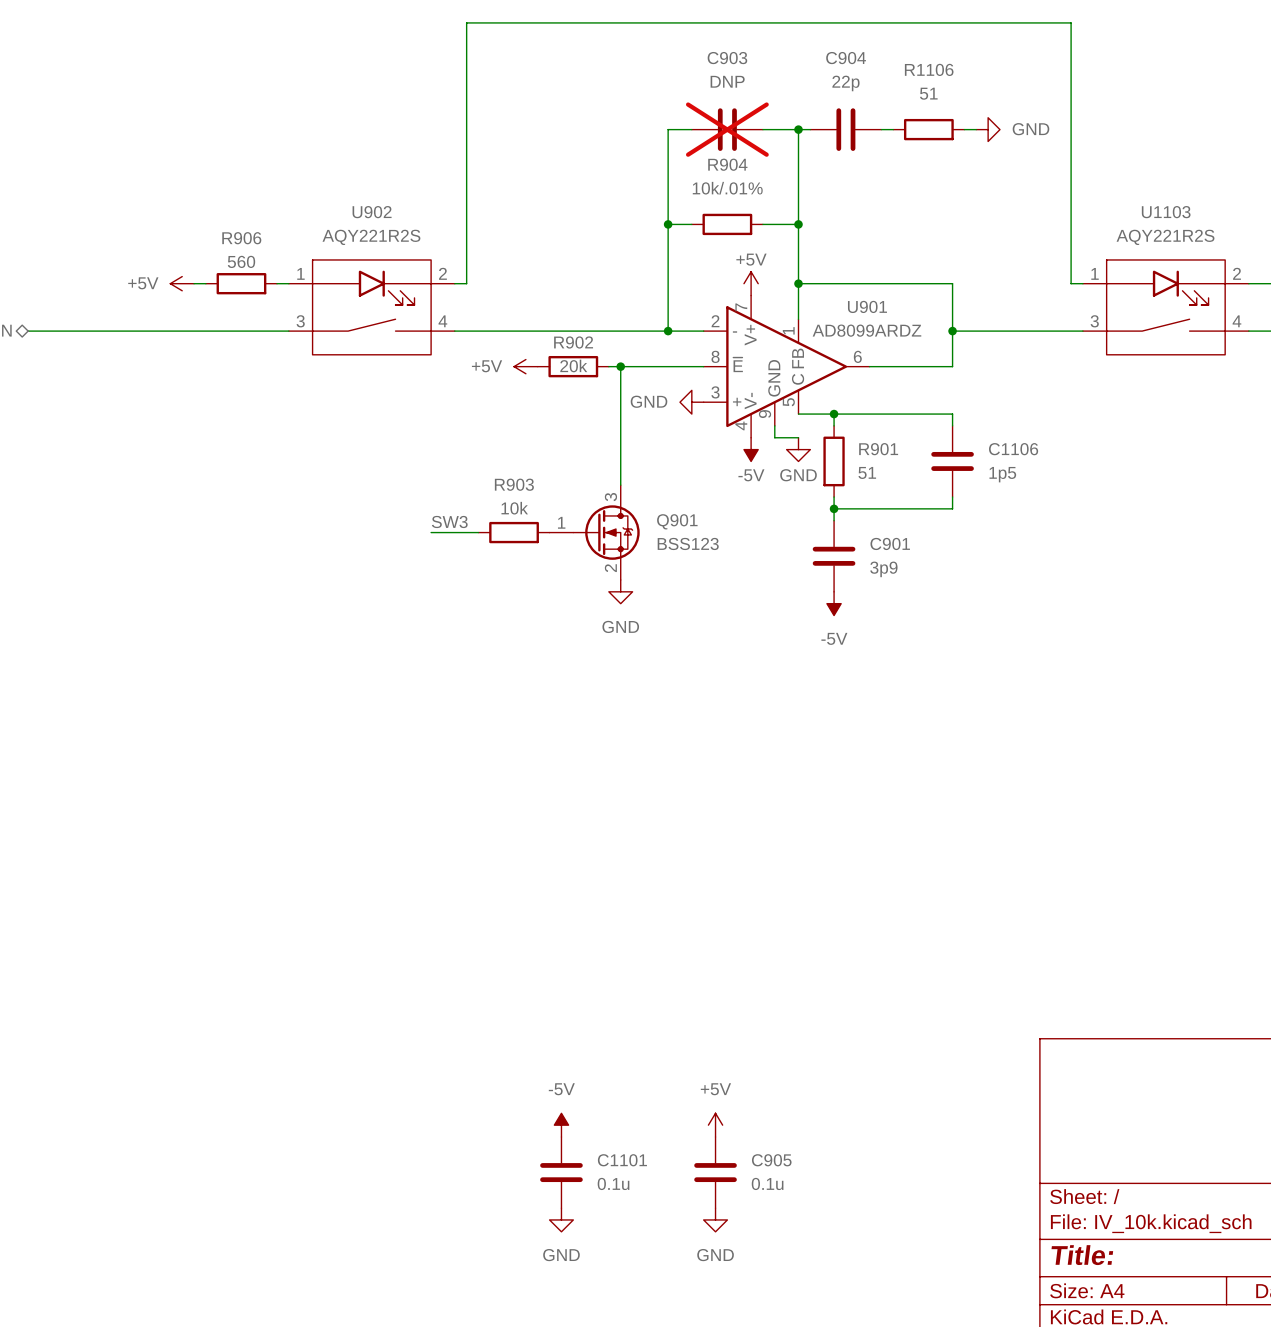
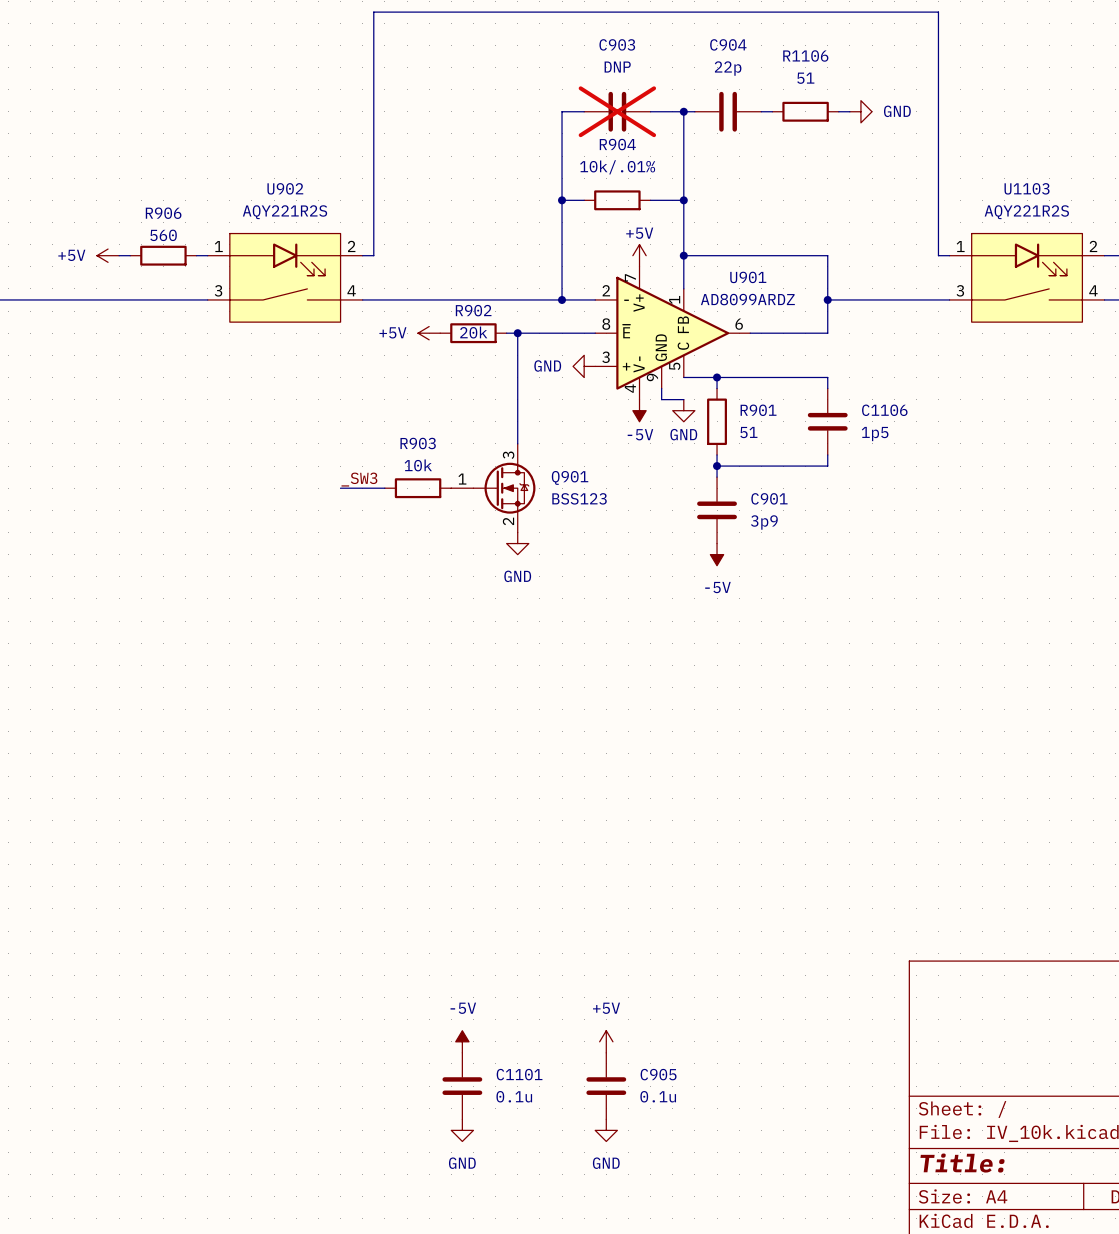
label: SW3 (449, 521) -> _SW3 (359, 479)

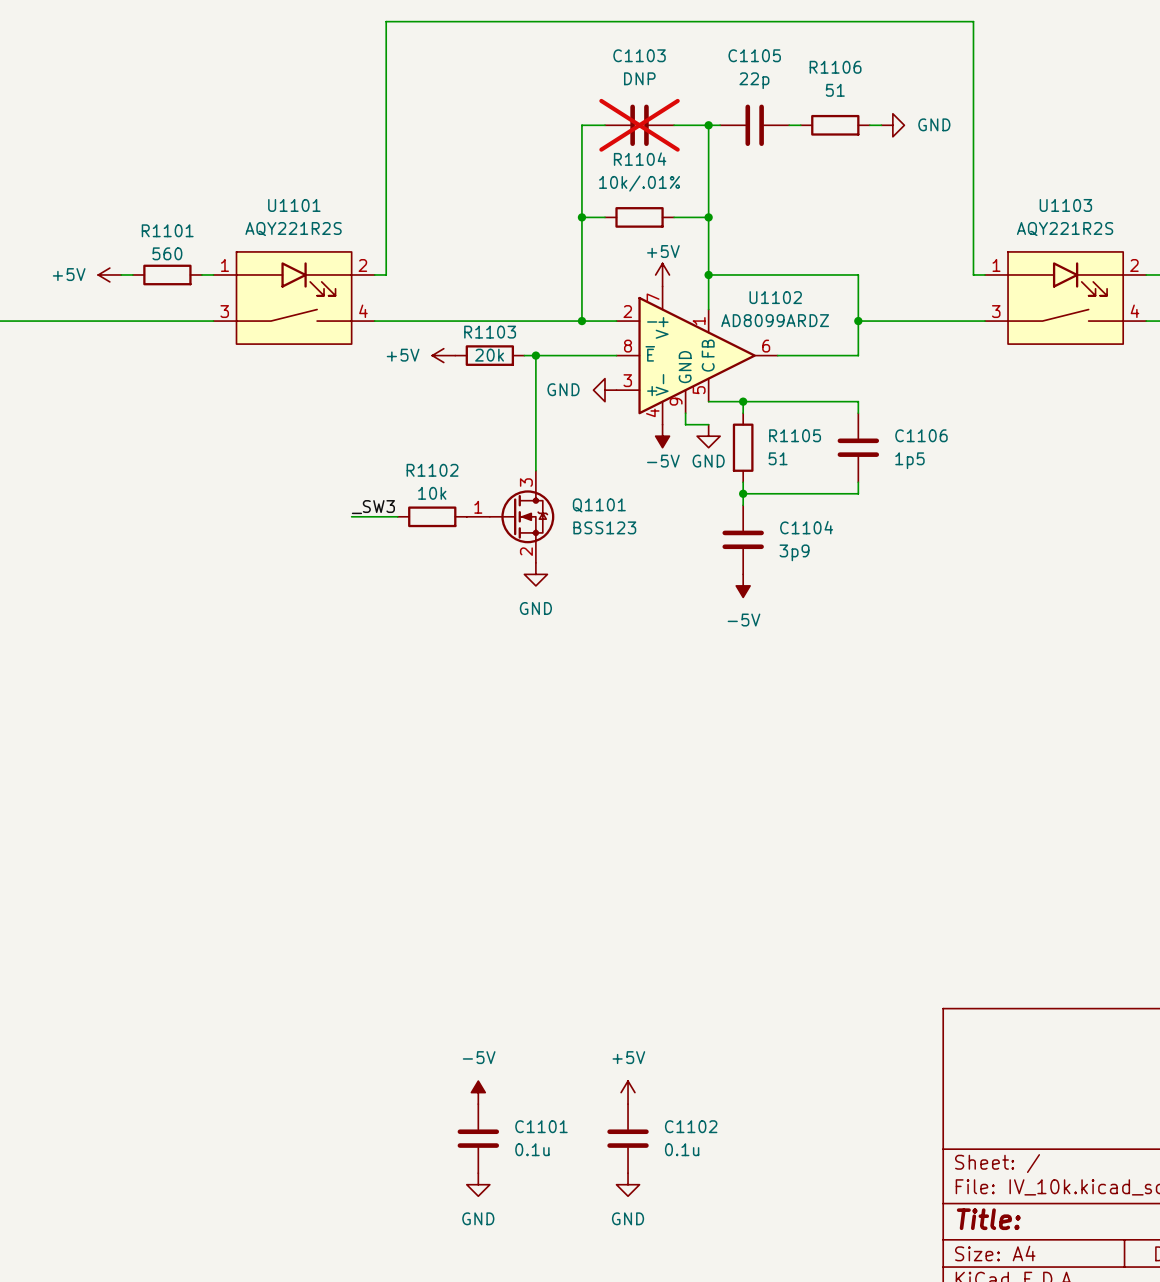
C903 name: C903 (617, 44) -> C1103 (639, 55)
C904 name: C904 (728, 44) -> C1105 (754, 55)
R904 name: R904 (617, 144) -> R1104 (640, 159)
U902 name: U902 (285, 188) -> U1101 (294, 205)
R906 name: R906 (163, 213) -> R1101 (167, 230)
U901 name: U901 (748, 277) -> U1102 (775, 297)
R902 name: R902 (473, 310) -> R1103 (490, 332)
R901 name: R901 (758, 410) -> R1105 (795, 435)
R903 name: R903 (418, 443) -> R1102 (432, 470)
Q901 name: Q901 (570, 477) -> Q1101 (599, 505)
C901 name: C901 (769, 498) -> C1104 (806, 527)
C905 name: C905 (658, 1074) -> C1102 (691, 1126)

